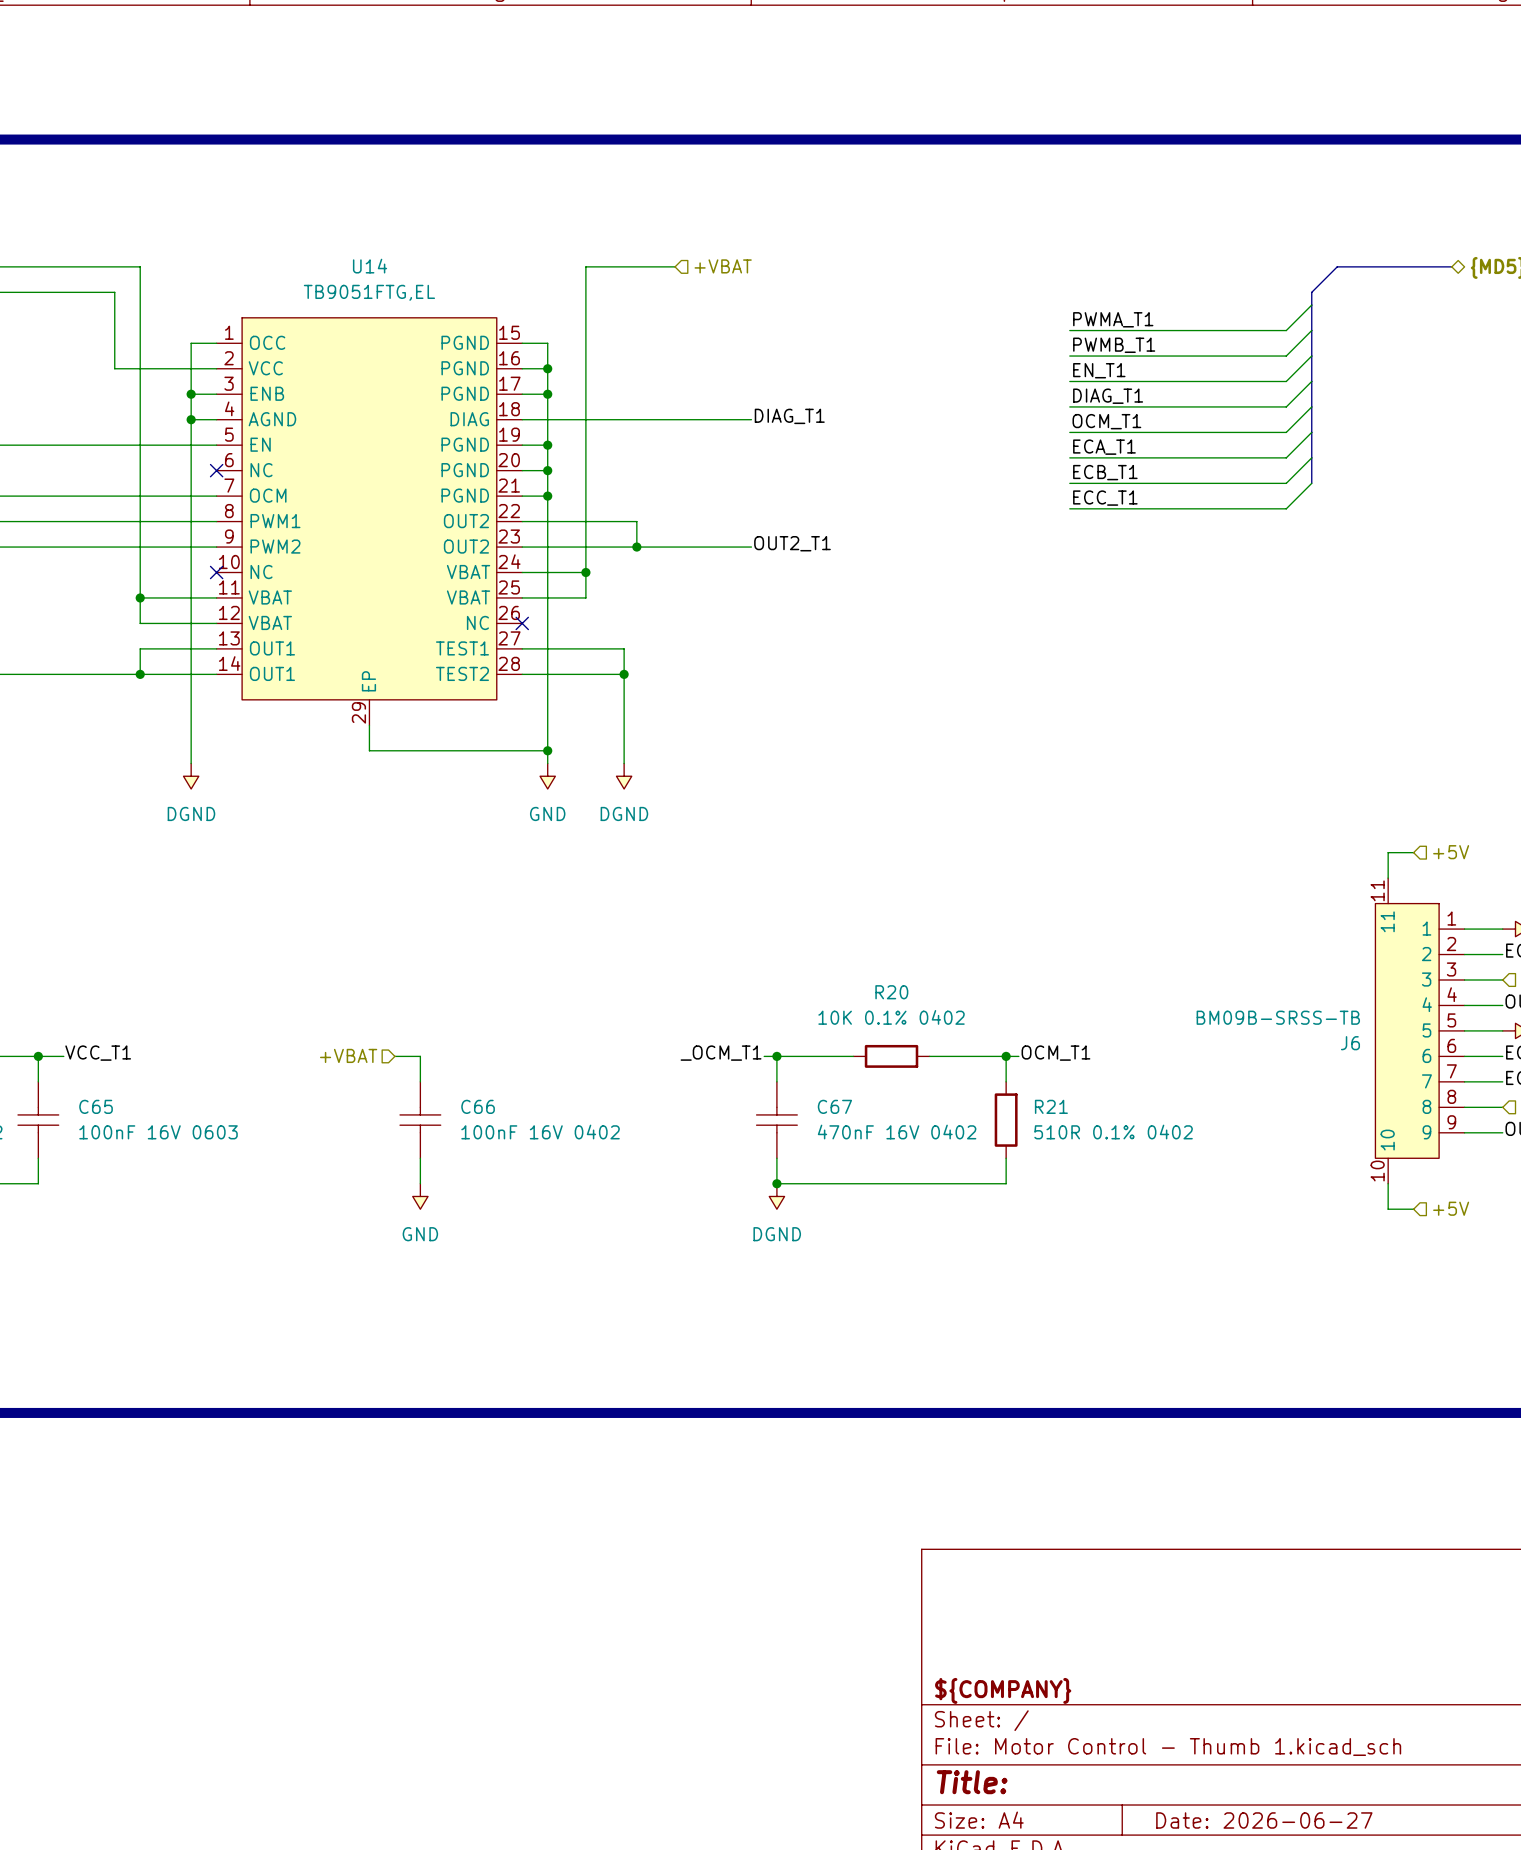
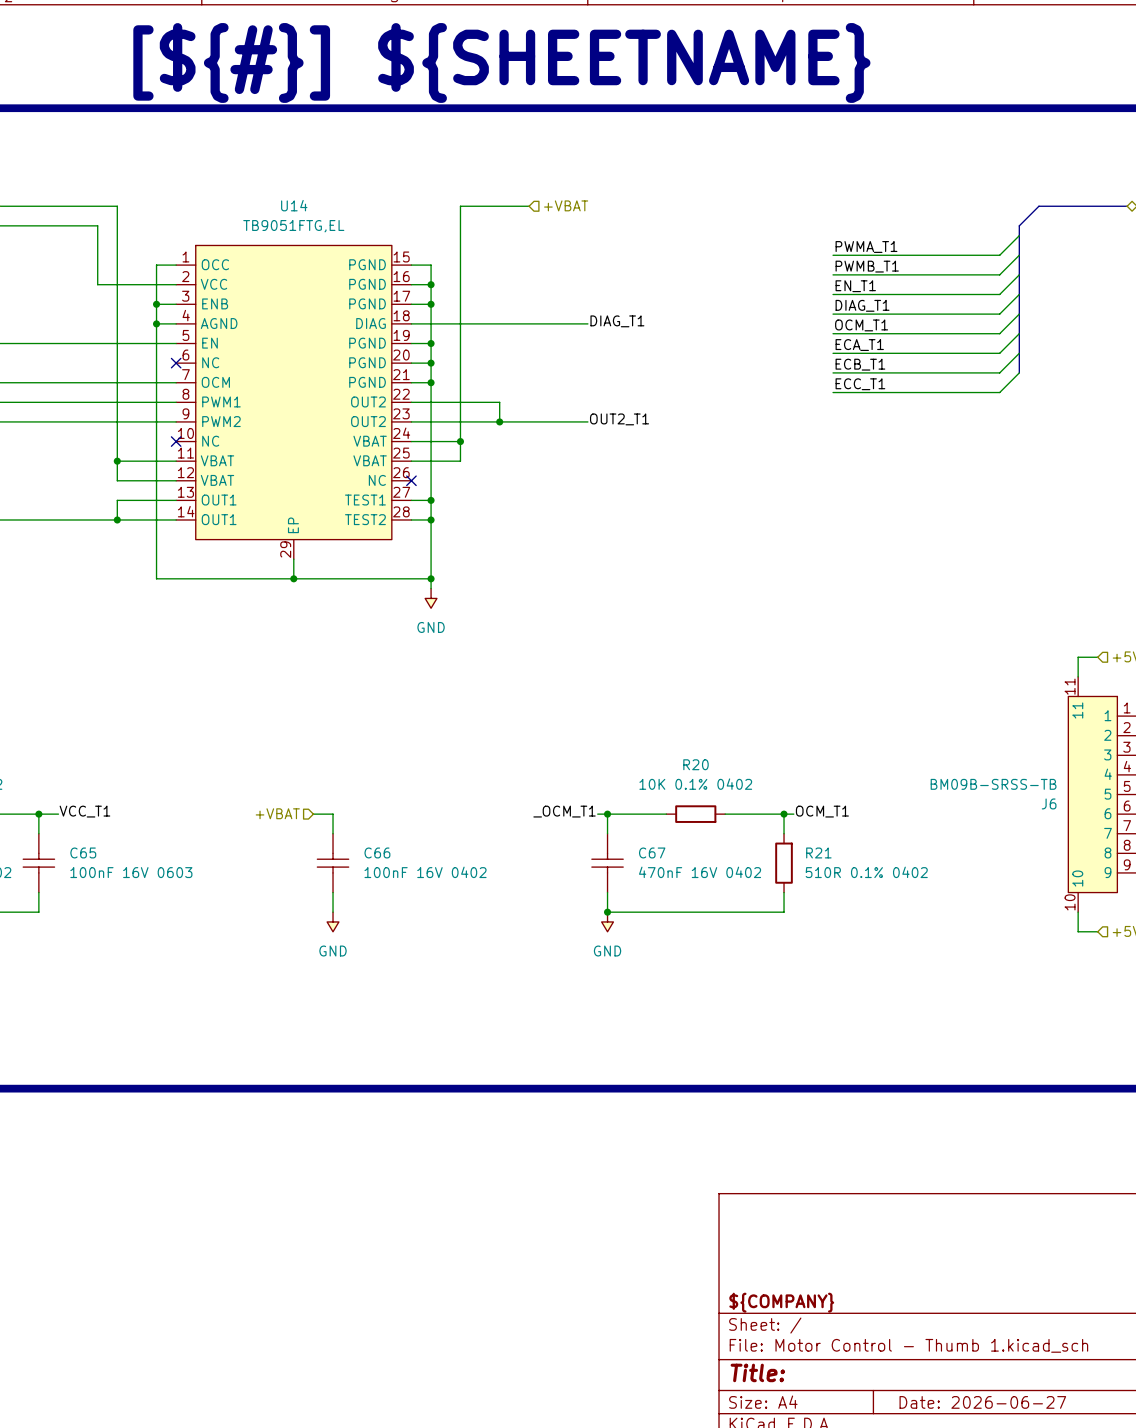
text: none -> [${#}] ${SHEETNAME} (501, 62)
wire: (547, 648) (624, 648) (624, 763) -> none
junction: none -> (431, 500)
wire: (547, 674) (624, 674) -> none
junction: none -> (431, 519)
junction: (624, 674) -> none
wire: (191, 750) (191, 763) -> (156, 578) (293, 578)
junction: none -> (293, 578)
power symbol: DGND (191, 776) -> none
power symbol: DGND (624, 776) -> none
power symbol: DGND (776, 1196) -> GND (607, 921)

